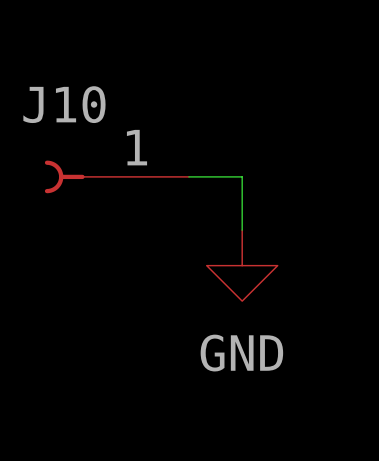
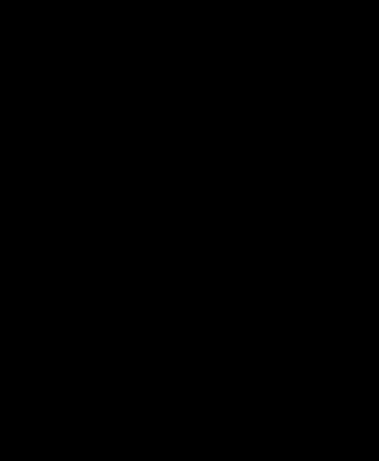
J10: (116, 176) -> none
wire: (188, 176) (242, 176) (242, 230) -> none
power symbol: GND (242, 265) -> none

